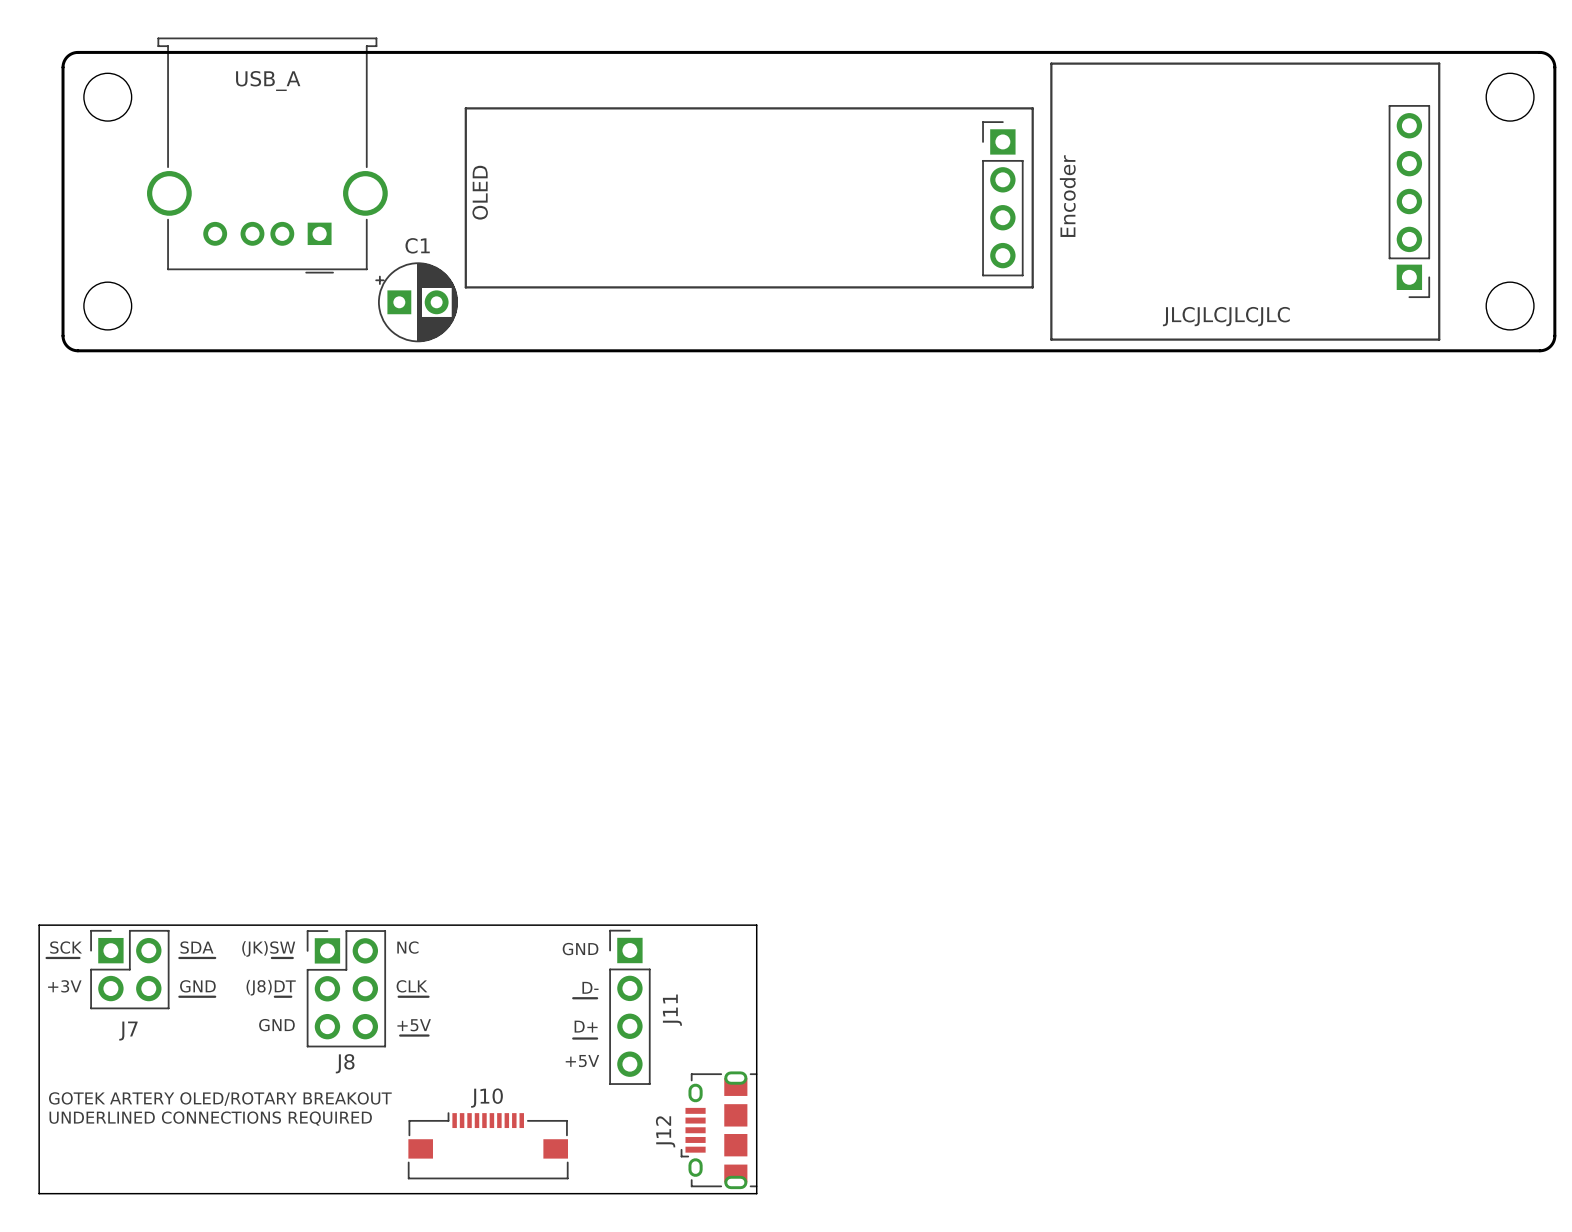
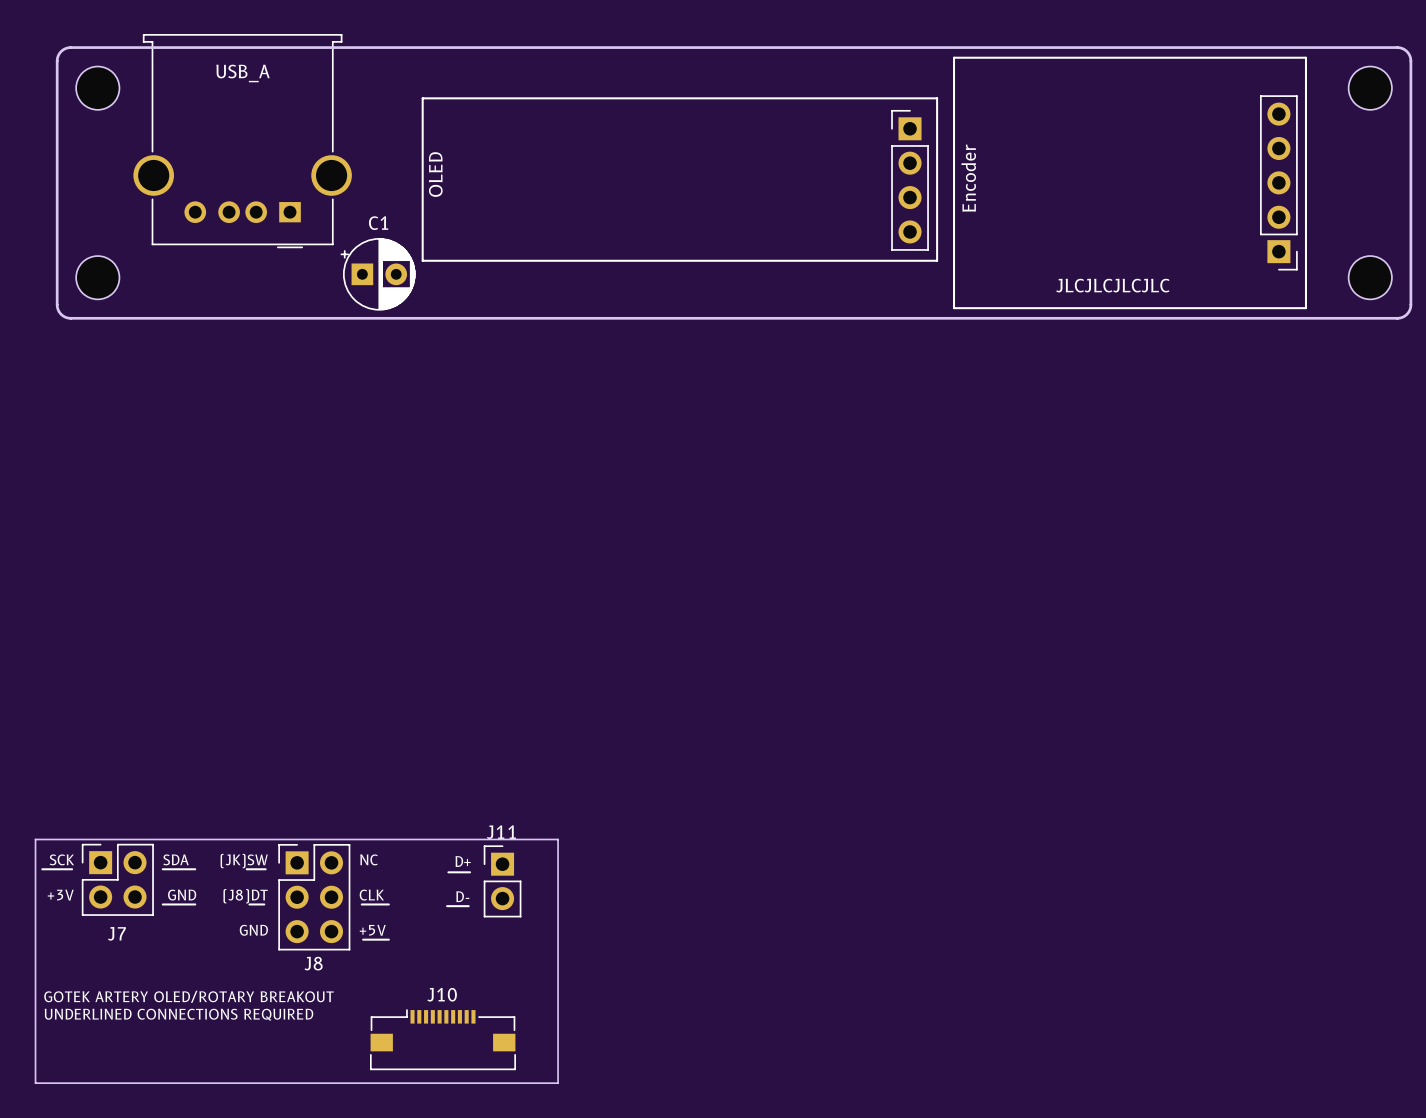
board edge: (614, 925) (756, 925) (756, 1193) (614, 1193) -> (558, 839) (558, 1083)
J11 footprint: [609, 929, 651, 1085] -> [483, 845, 522, 918]
text: GND (580, 949) -> none
text position: D- (590, 987) -> D- (462, 896)
line: (573, 998) (597, 998) -> (447, 906) (468, 906)
J11 name position: J11 (672, 1010) -> J11 (501, 832)
text position: D+ (586, 1026) -> D+ (463, 861)
line: (573, 1038) (597, 1038) -> (448, 872) (470, 872)
text: +5V (582, 1061) -> none
J12: (719, 1130) -> none

